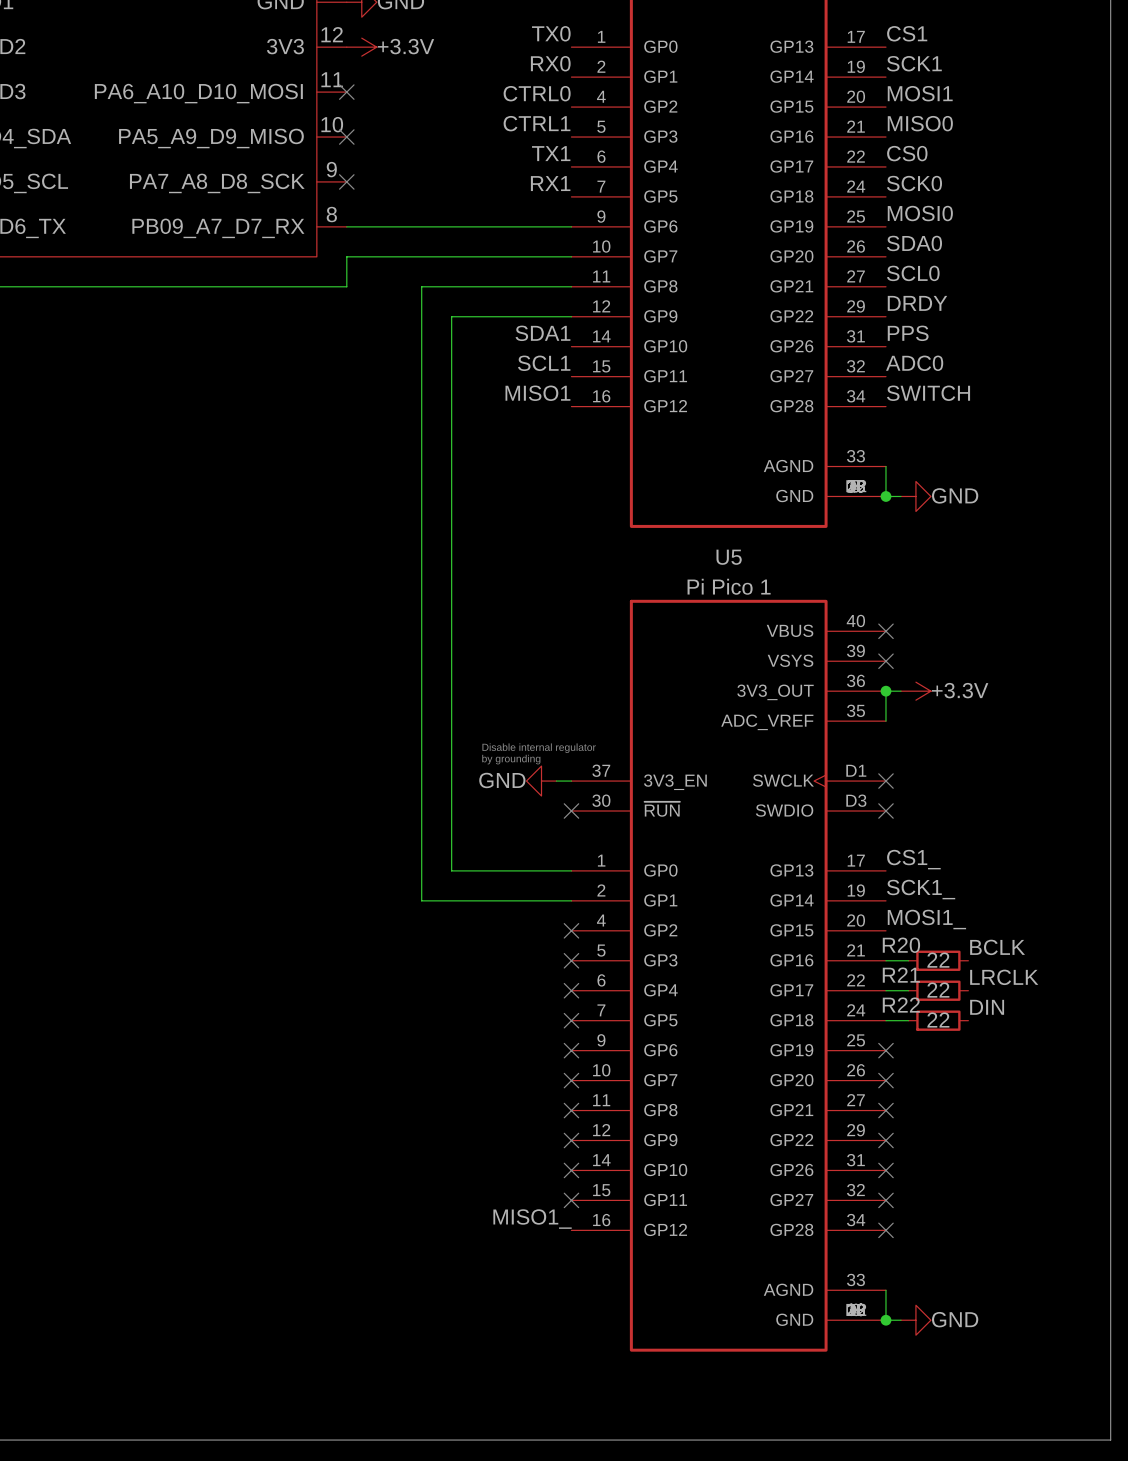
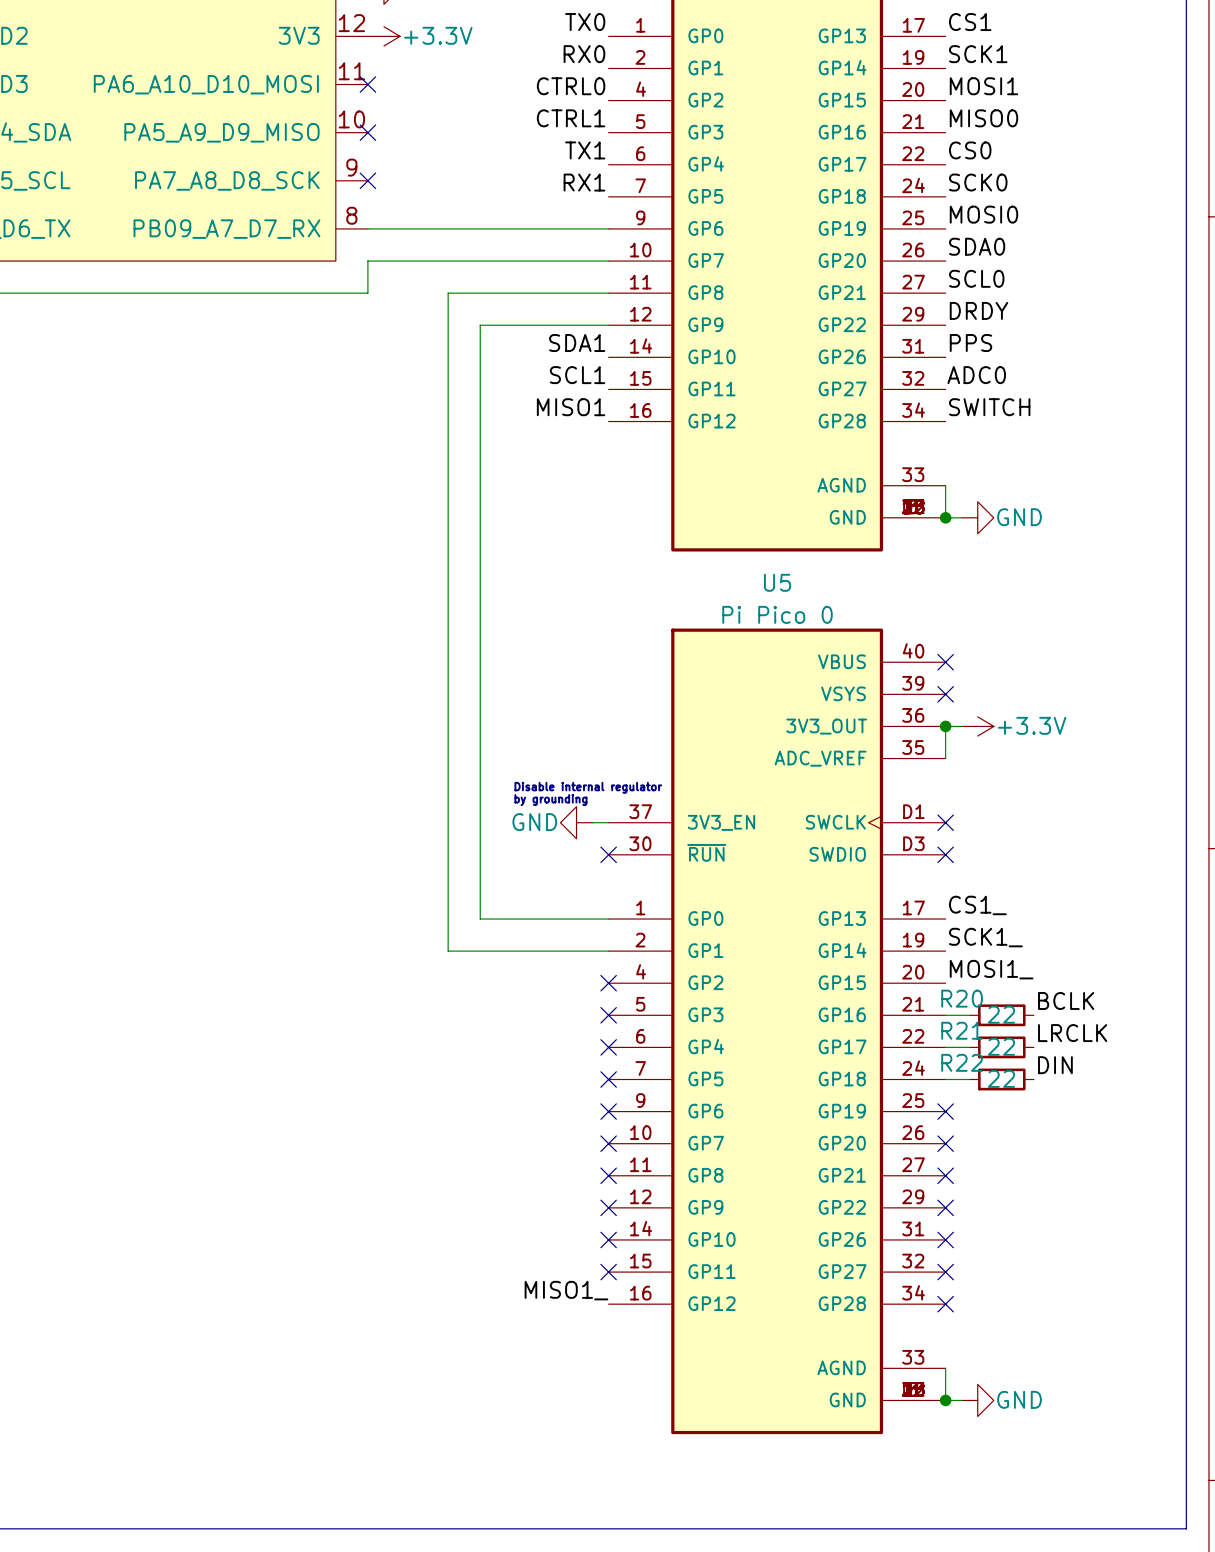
U5 value: Pi Pico 1 (729, 586) -> Pi Pico 0 (777, 614)

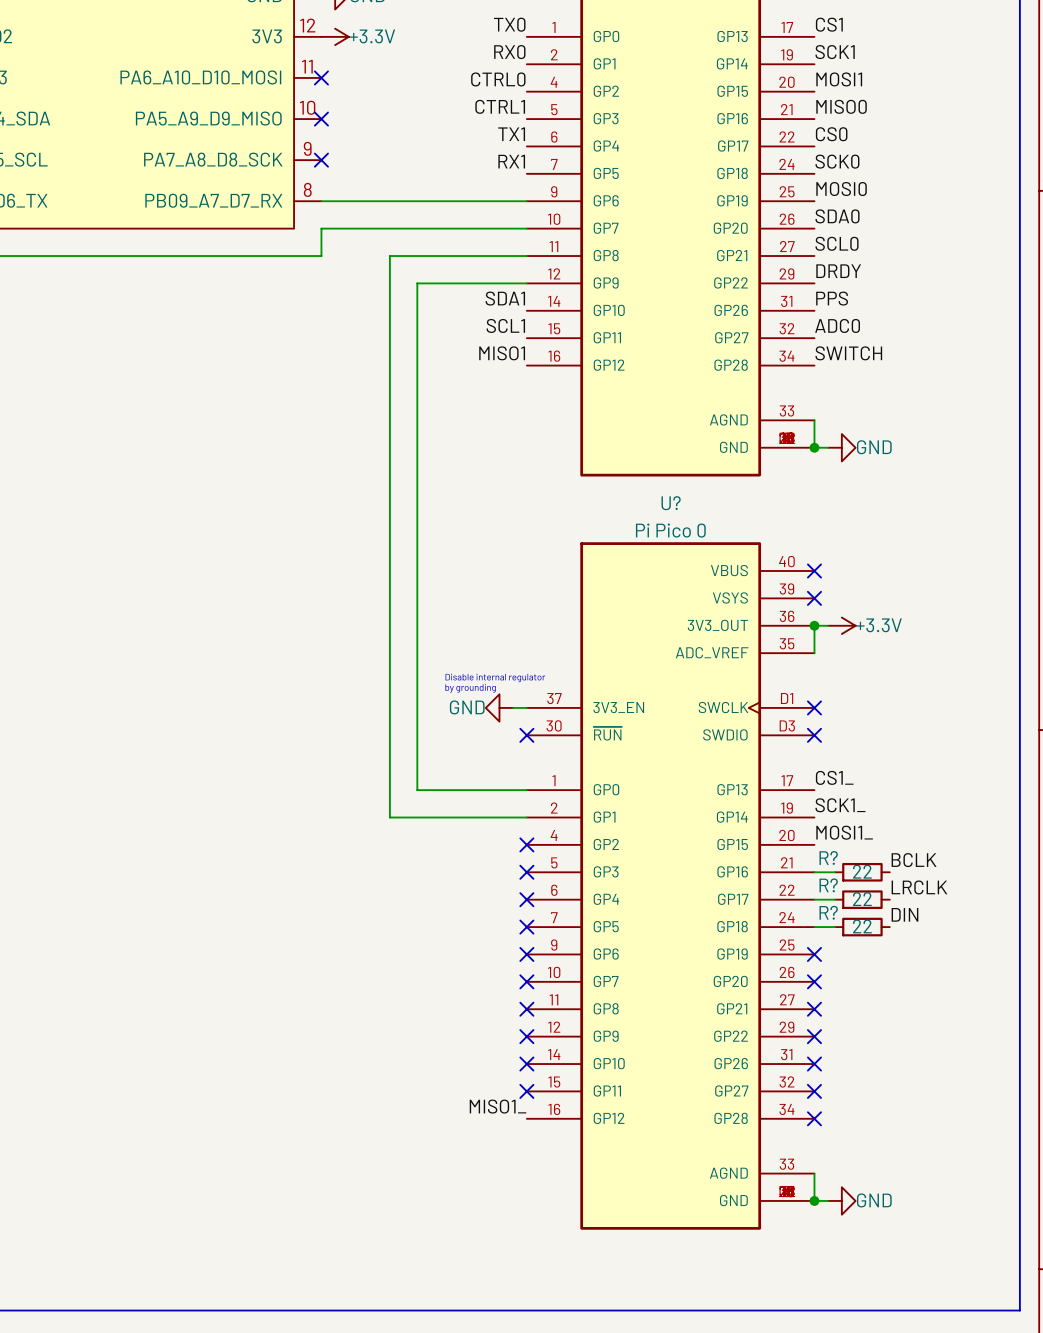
U5 name: U5 (777, 582) -> U? (671, 503)
R20 name: R20 (962, 998) -> R? (828, 857)
R21 name: R21 (962, 1030) -> R? (828, 885)
R22 name: R22 (962, 1062) -> R? (828, 912)

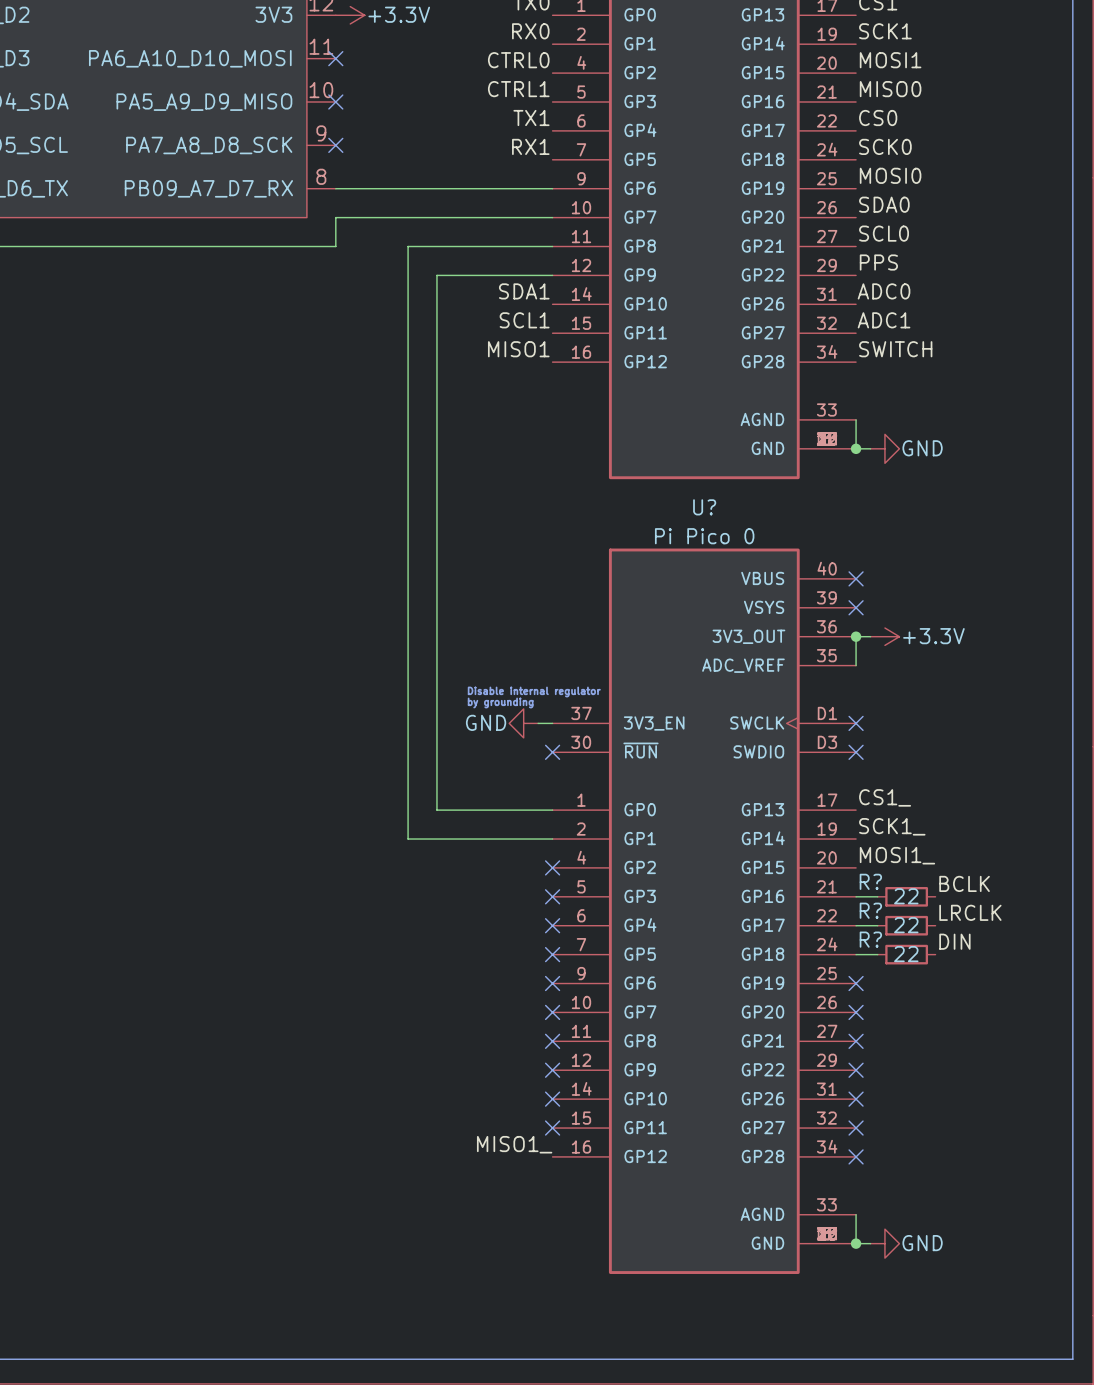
label: DRDY (838, 271) -> PPS (878, 262)
label: PPS (832, 298) -> ADC0 (884, 291)
label: ADC0 (837, 325) -> ADC1 (884, 320)

